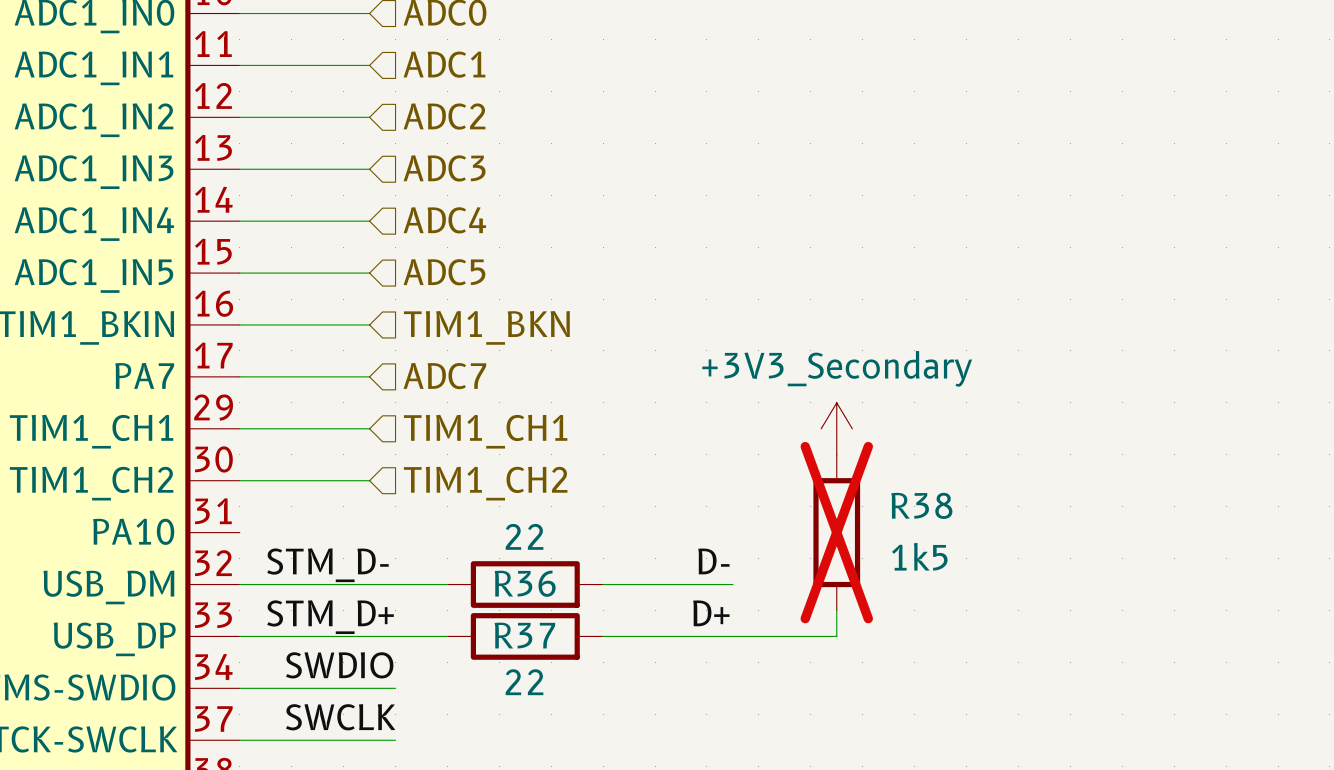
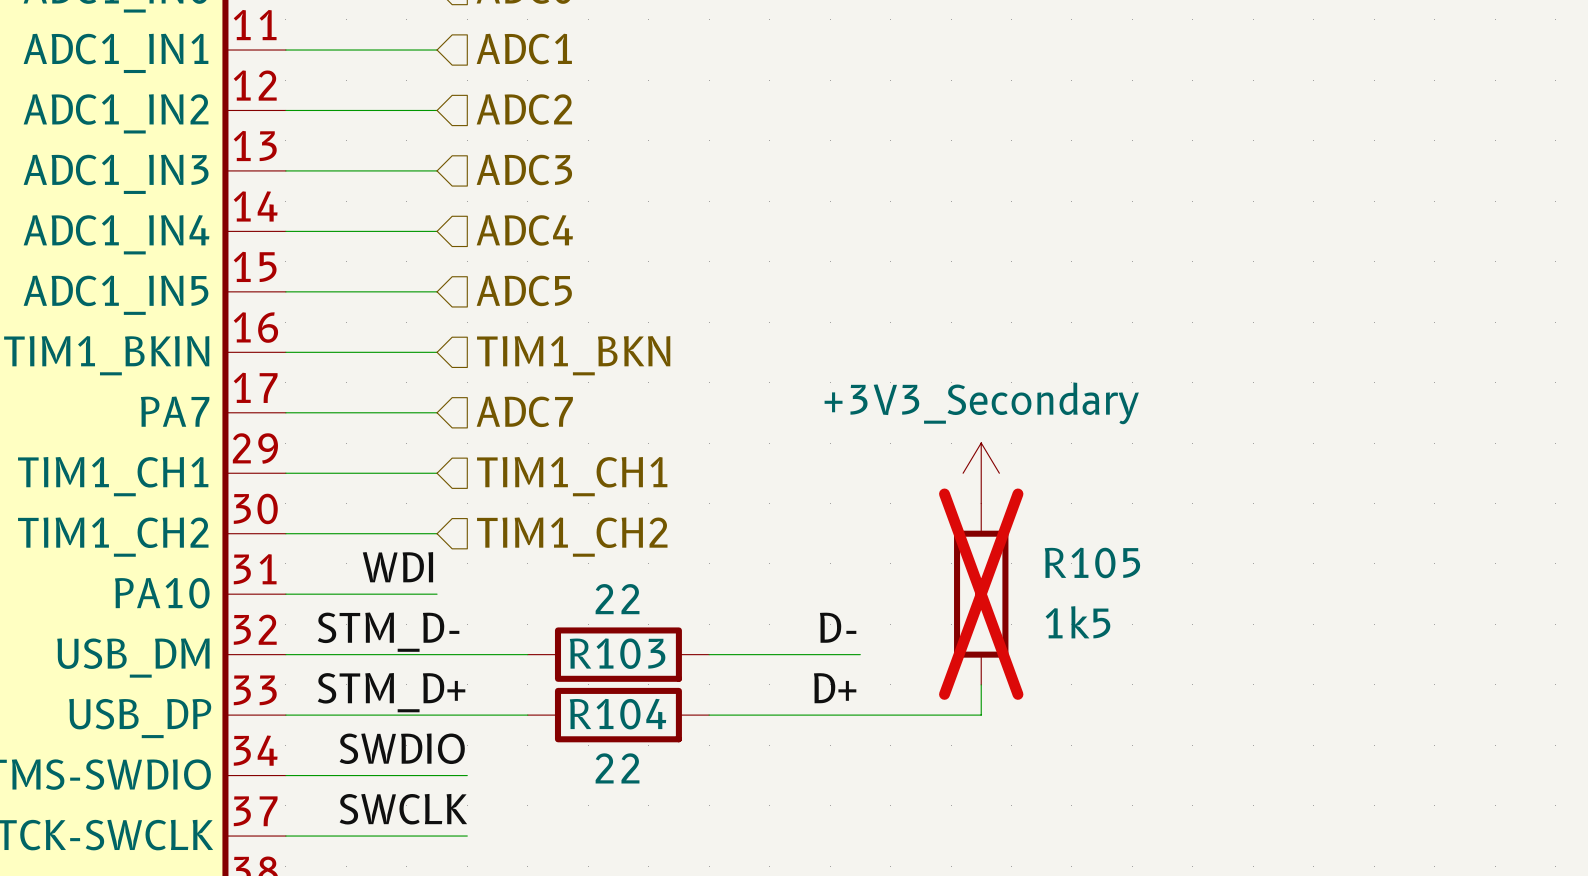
R38 name: R38 (921, 505) -> R105 (1092, 562)
label: none -> WDI (397, 567)
wire: none -> (285, 594) (437, 594)
R36 name: R36 (525, 583) -> R103 (617, 653)
R37 name: R37 (524, 635) -> R104 (618, 714)

